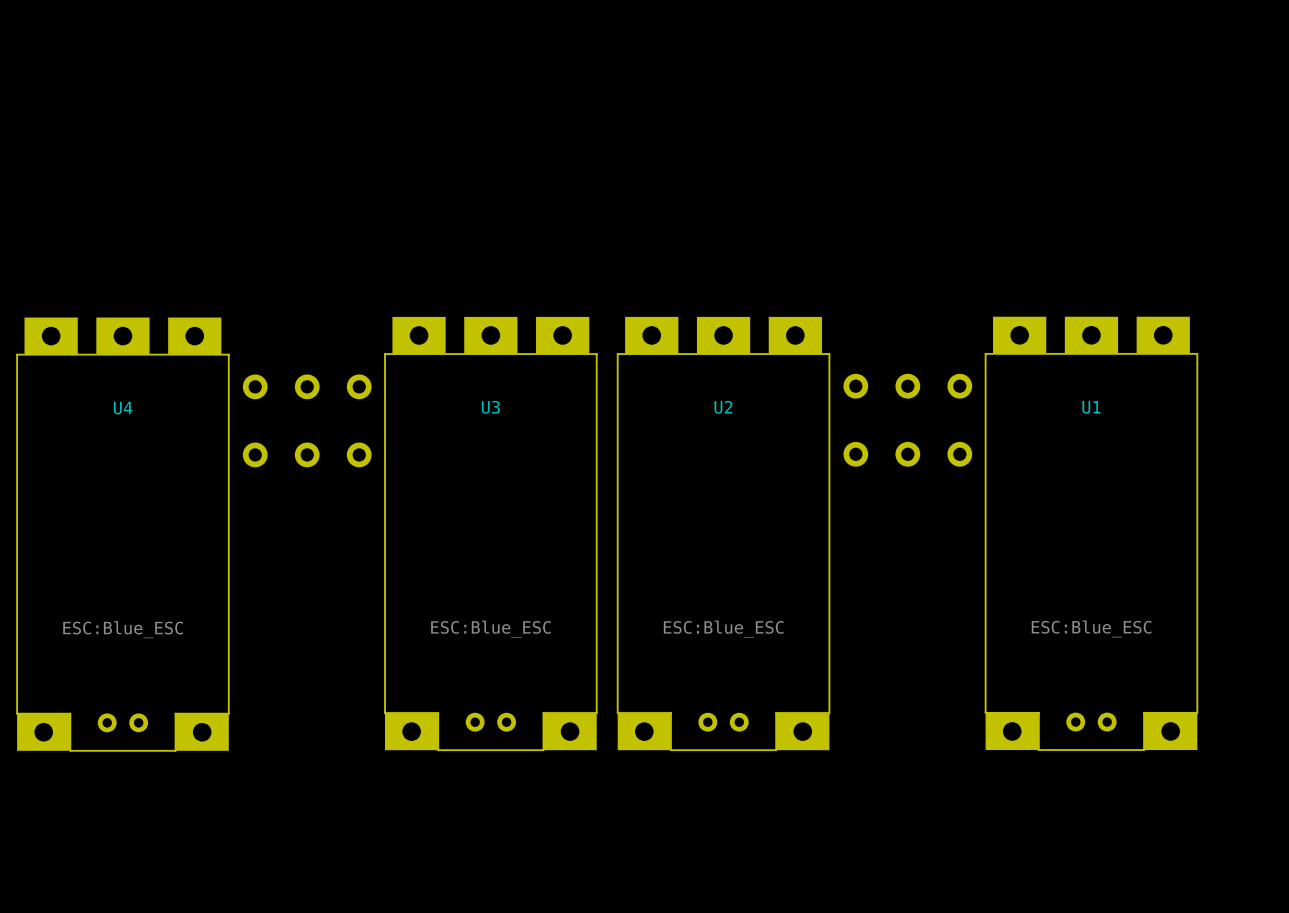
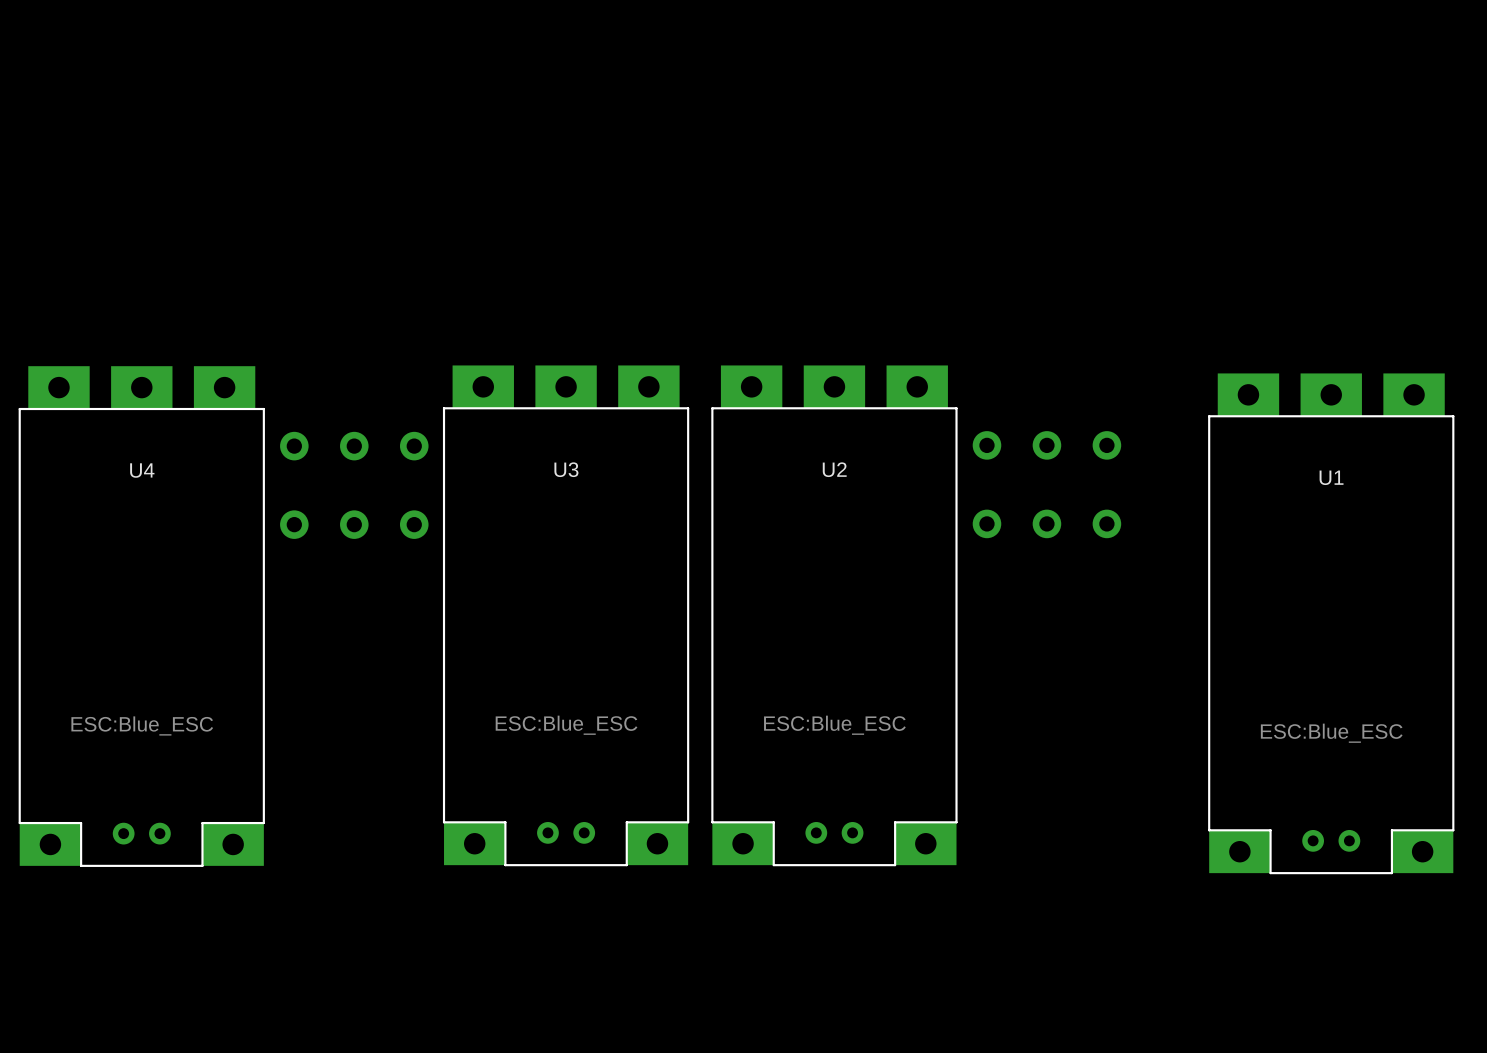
U1 position: (1091, 533) -> (1331, 623)

